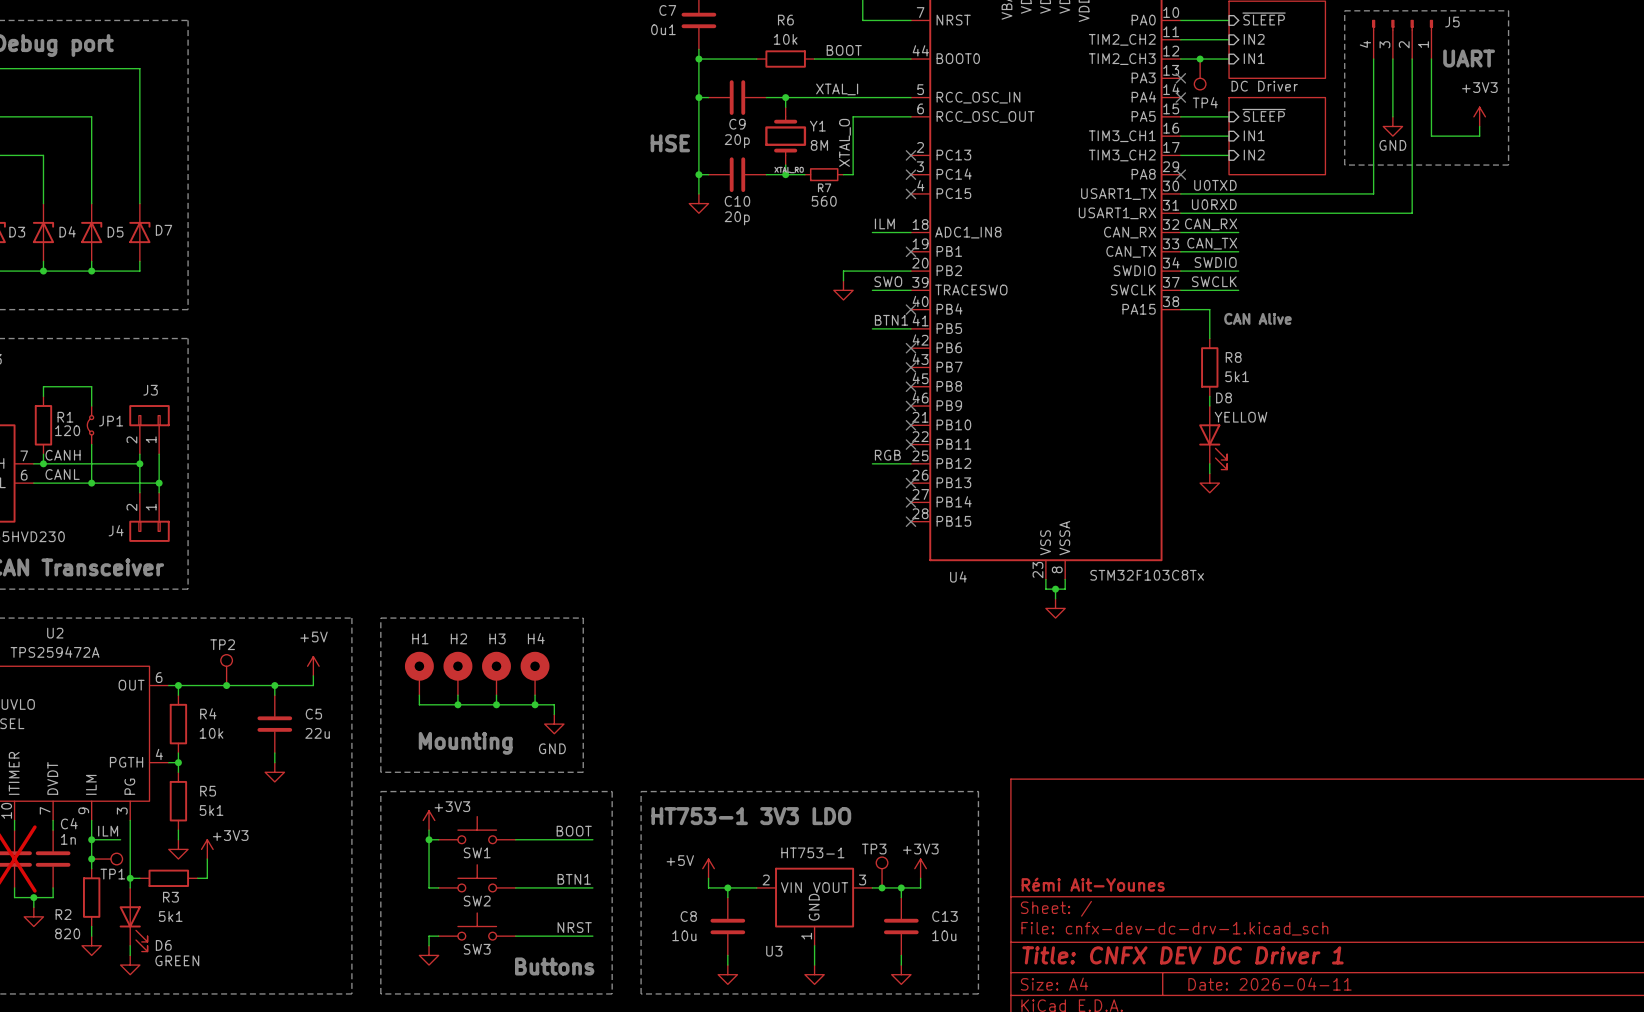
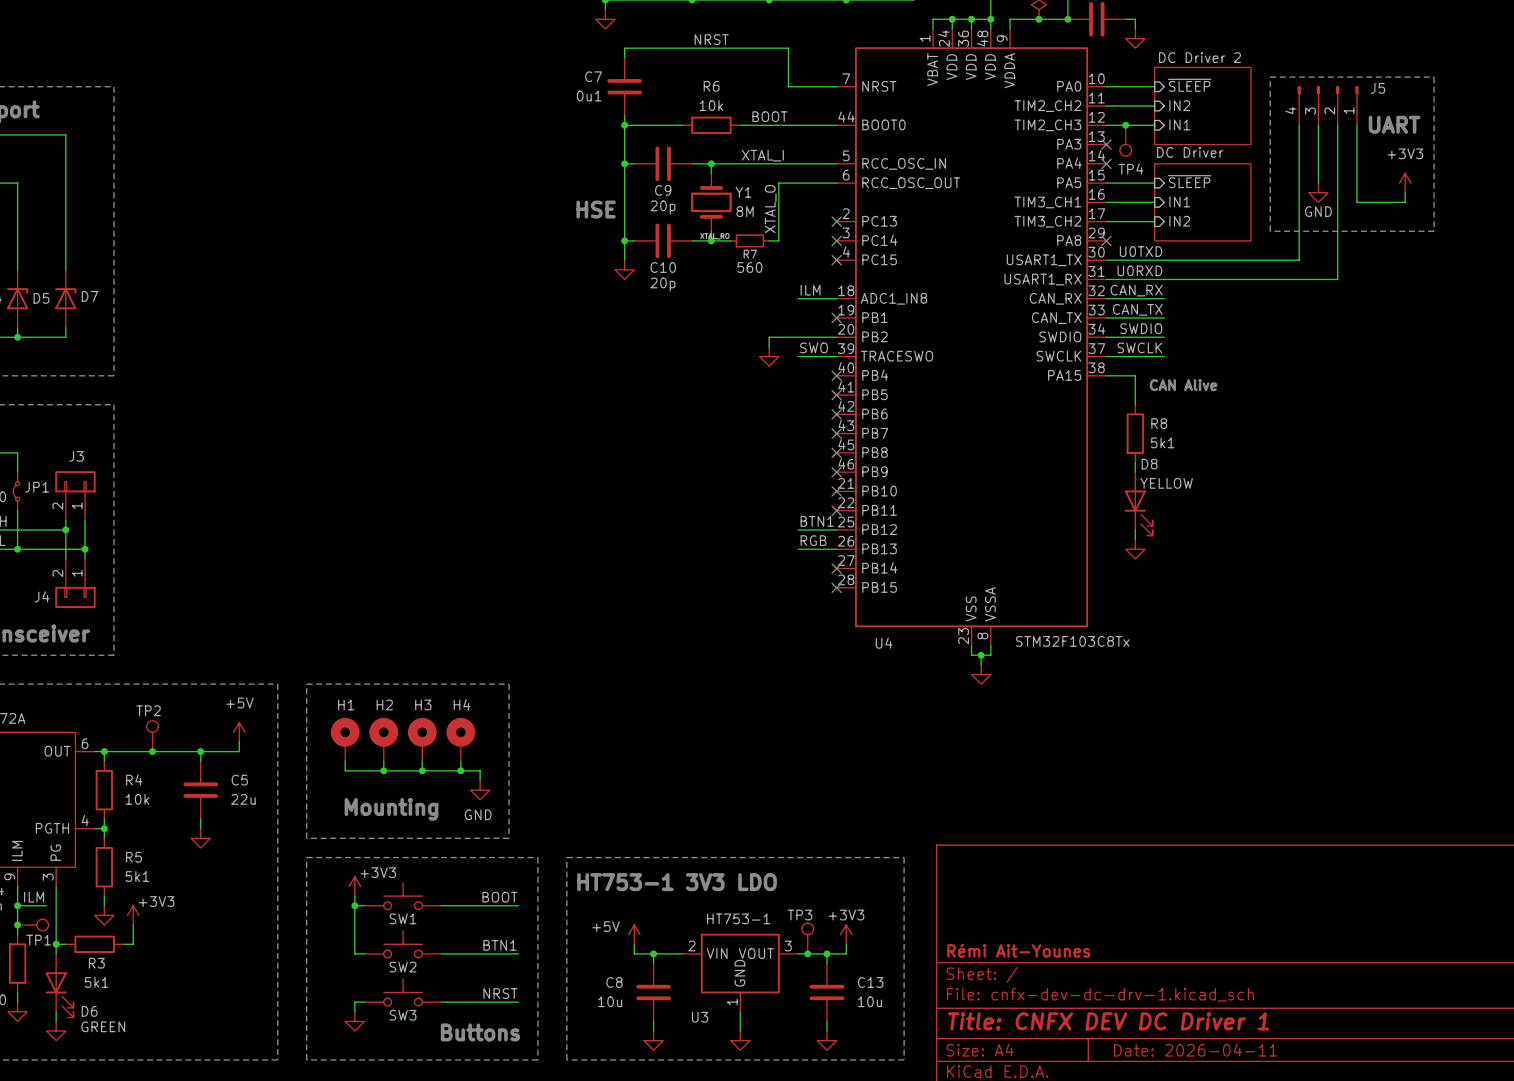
label: BTN1 (891, 320) -> none
wire: (872, 328) (910, 328) -> (798, 549) (836, 549)
no-connect mark: none -> (836, 395)
label: RGB (887, 455) -> BTN1 (817, 521)
label: none -> RGB (813, 540)
no-connect mark: (910, 483) -> none

